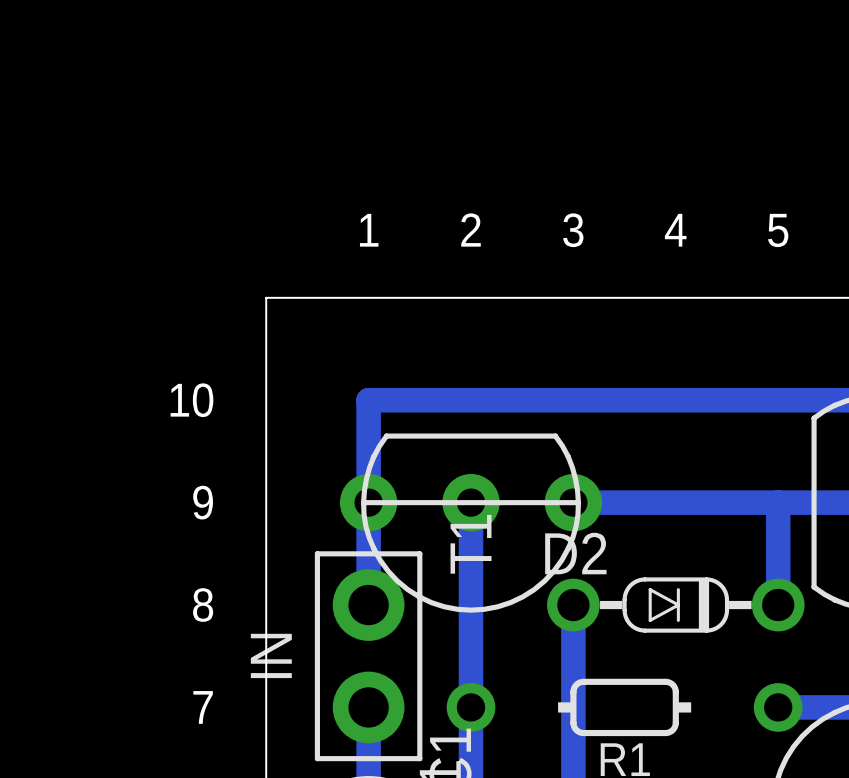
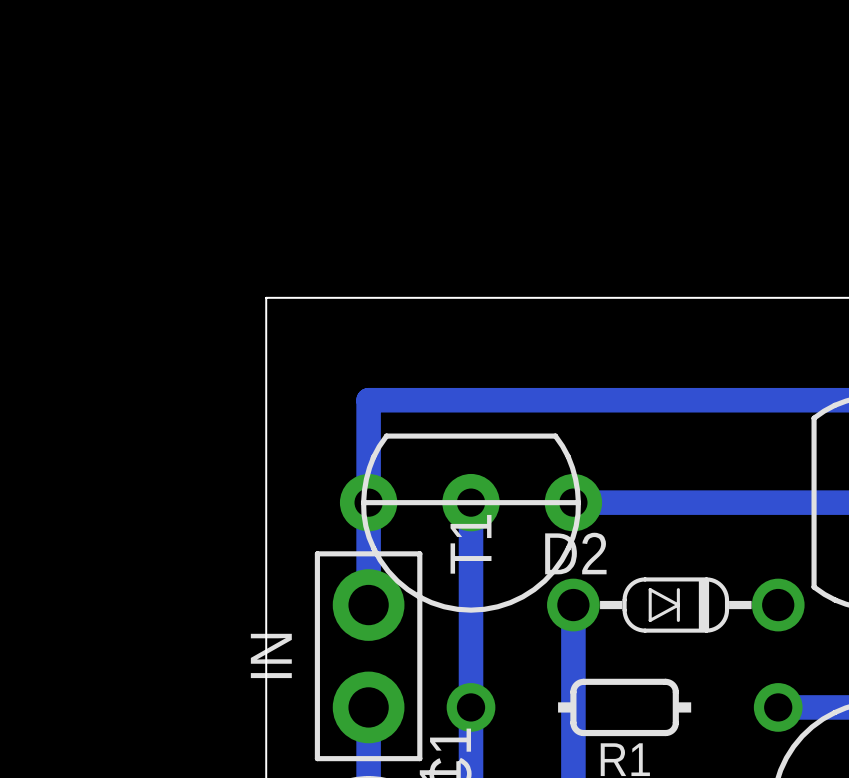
text: 1 (369, 230) -> none
text: 2 (471, 230) -> none
text: 3 (573, 230) -> none
text: 4 (675, 230) -> none
text: 5 (778, 230) -> none
text: 10 (191, 400) -> none
text: 9 (203, 502) -> none
bottom track: (778, 502) (778, 605) -> none
text: 8 (203, 605) -> none
text: 7 (203, 707) -> none

